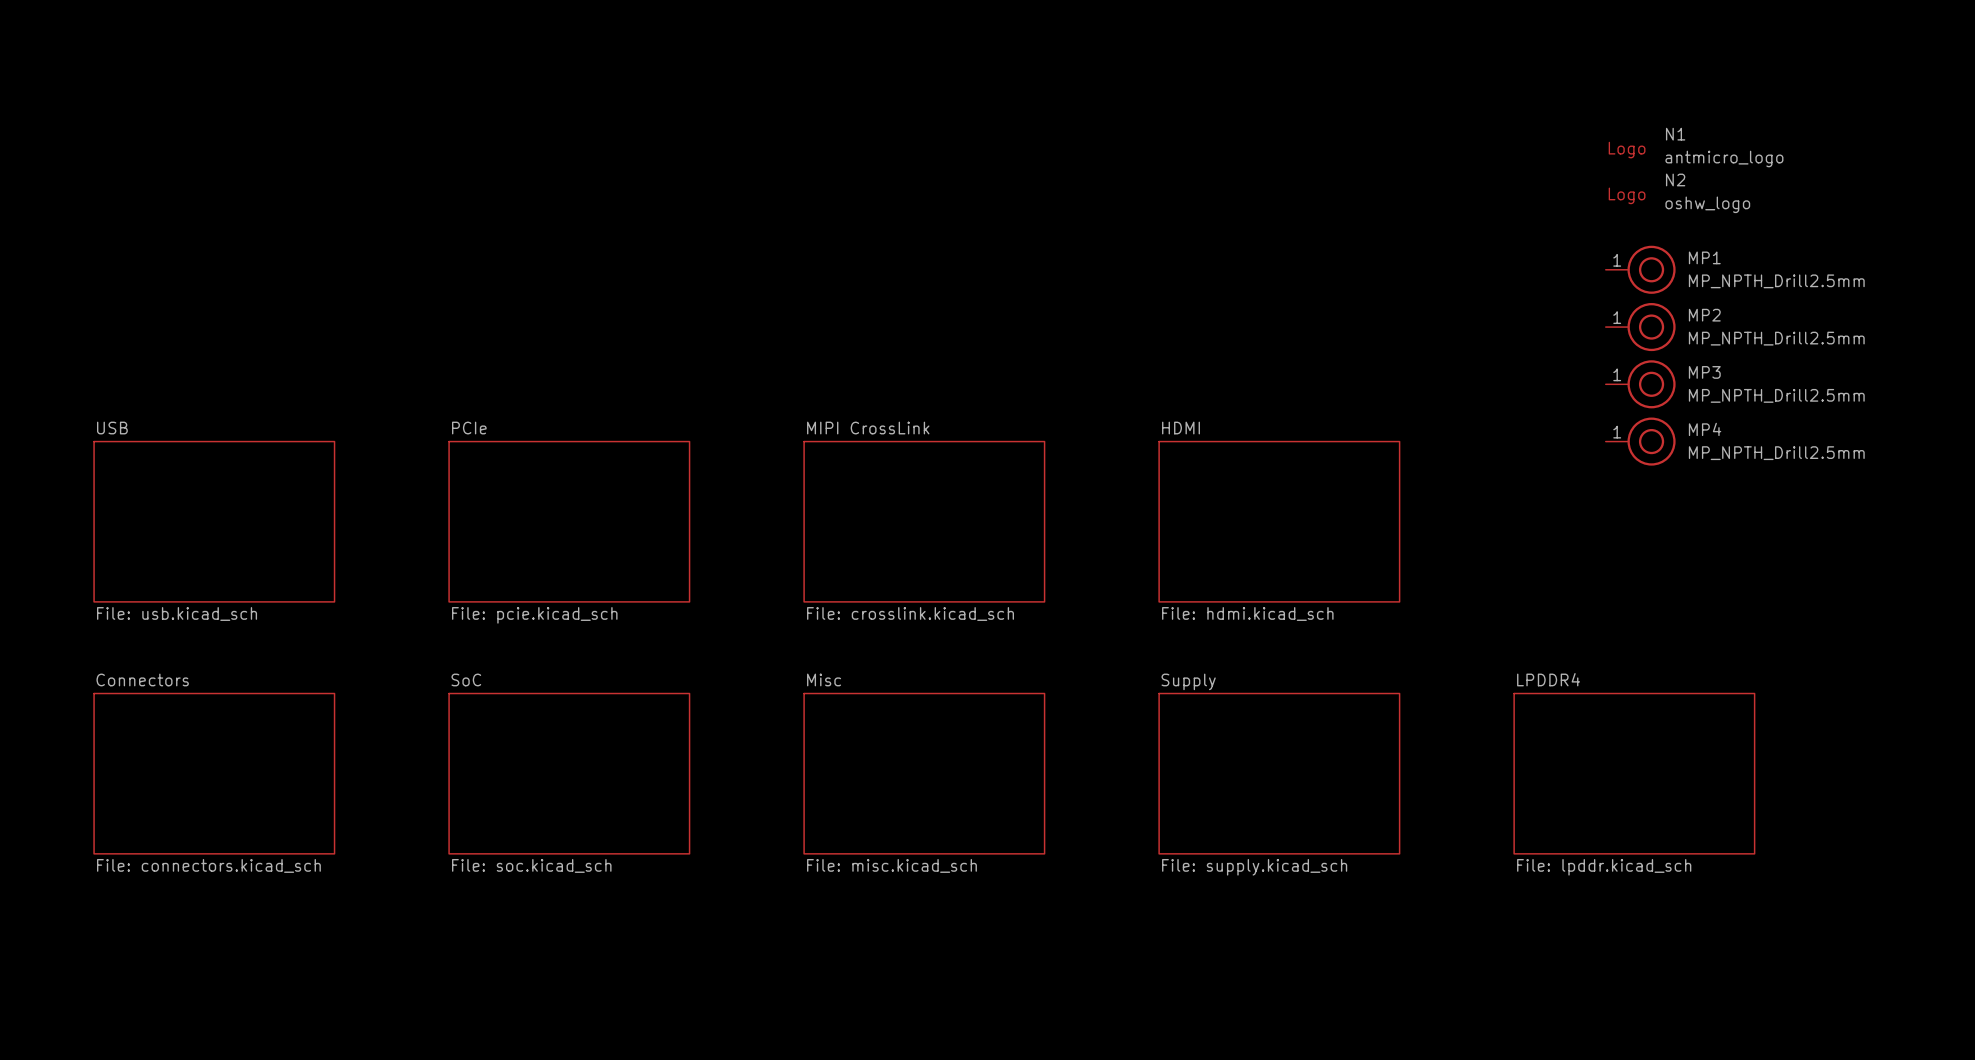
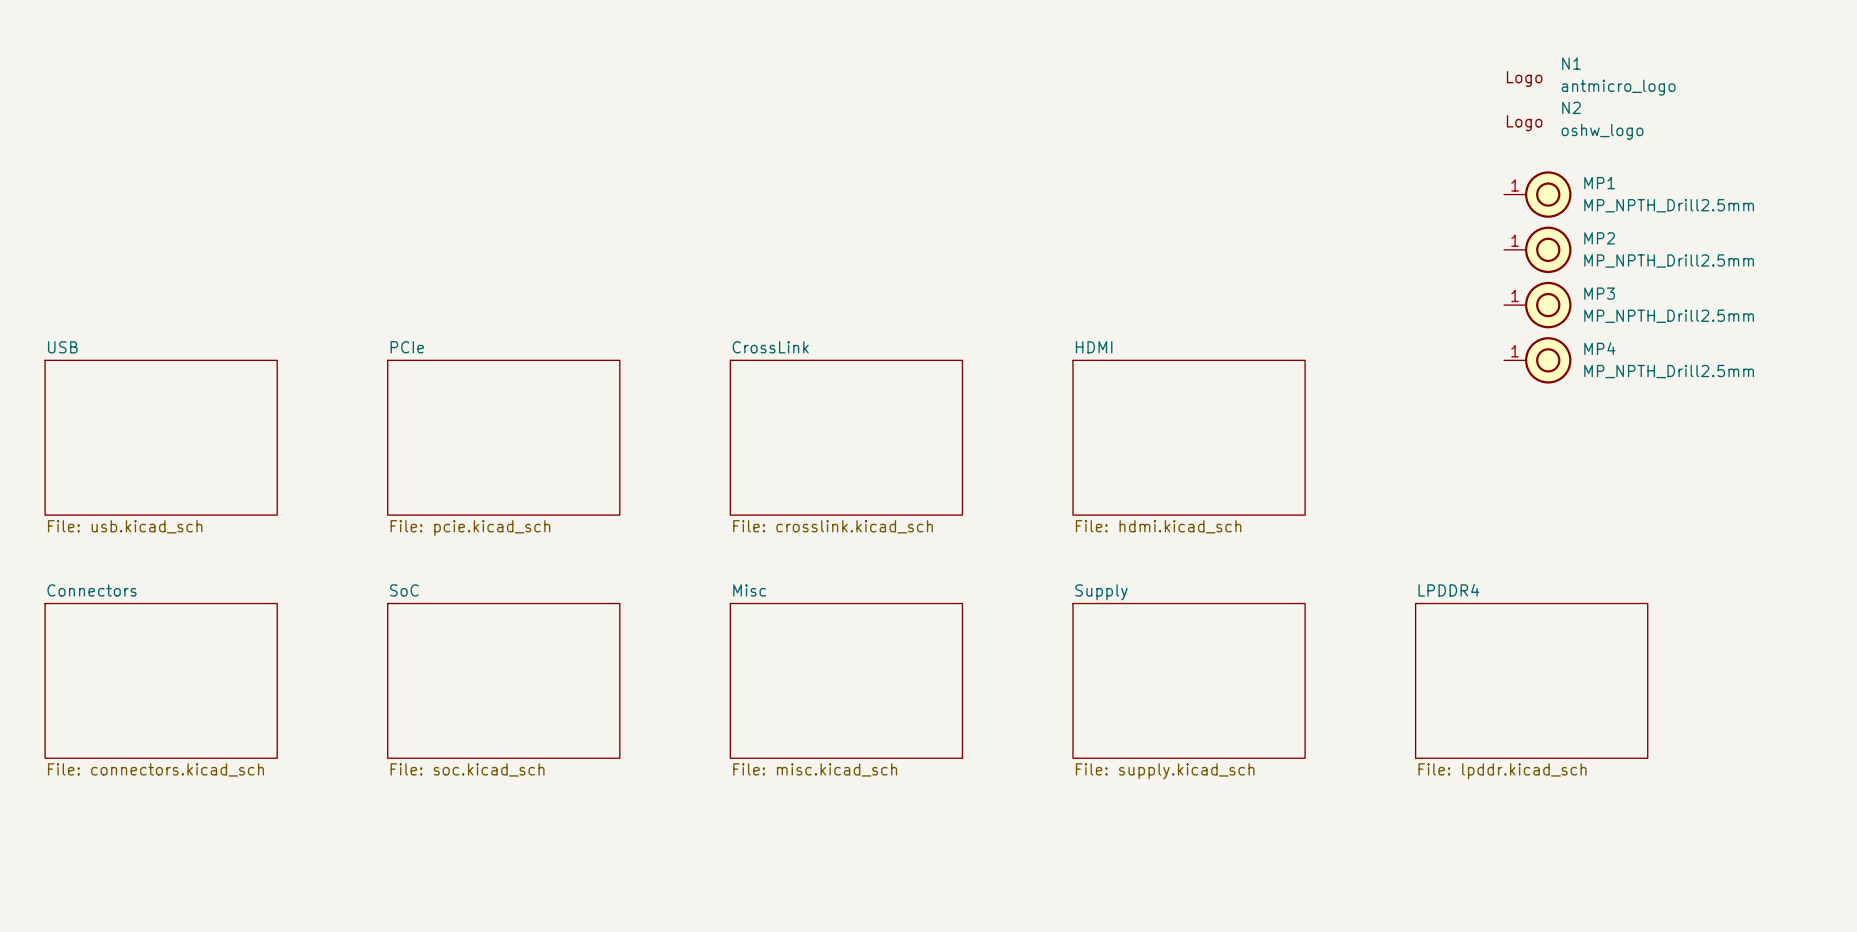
sheet MIPI CrossLink name: MIPI CrossLink (868, 428) -> CrossLink (770, 347)

